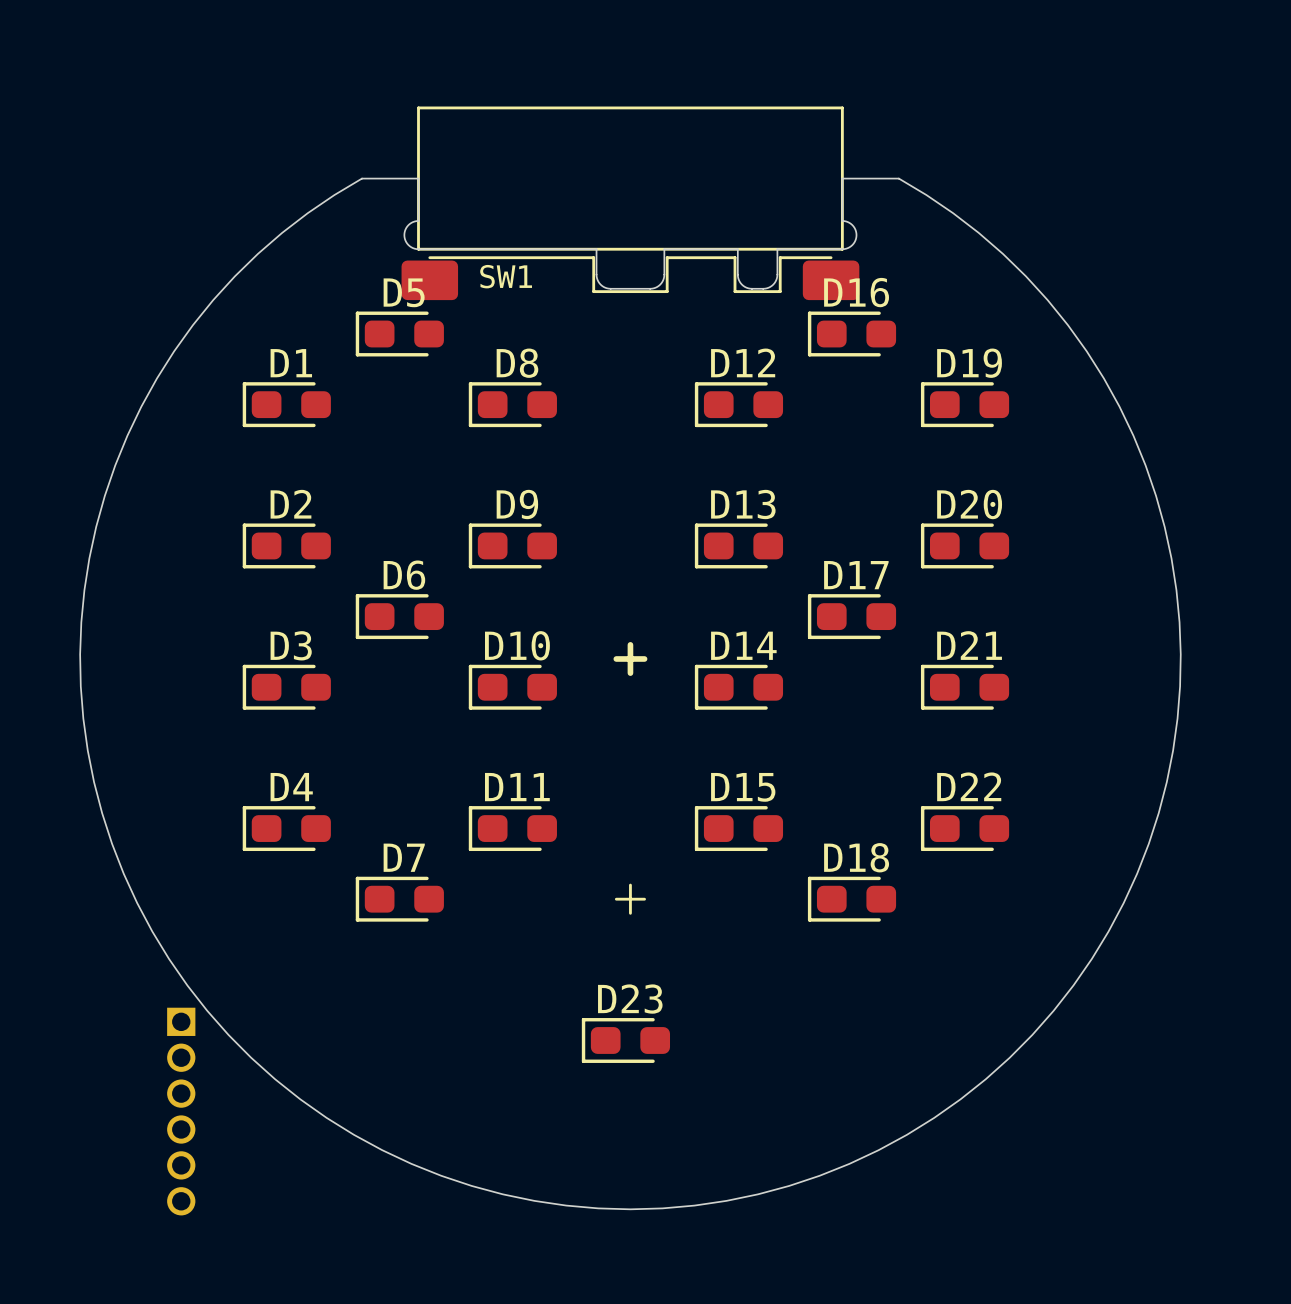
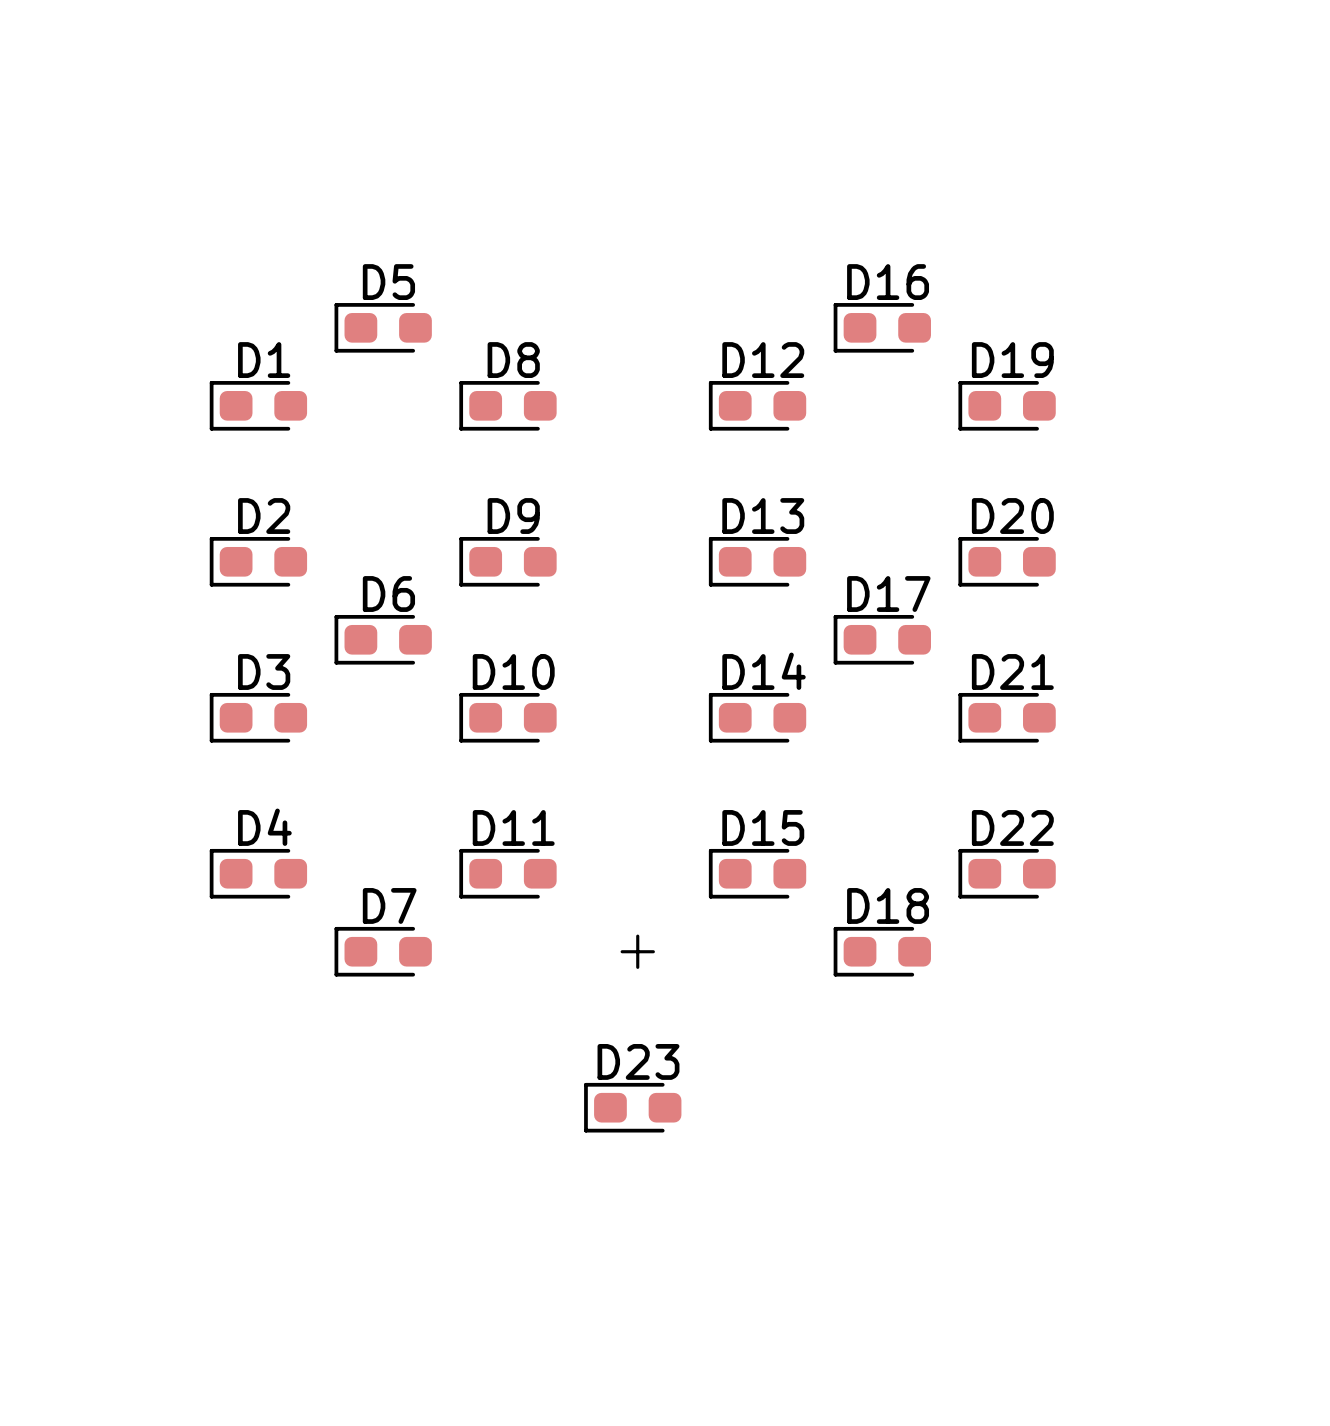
line: (418, 107) (842, 107) (842, 249) (418, 249) (418, 107) -> none
board edge: (361, 178) (418, 178) (418, 220) (409, 223) (404, 233) (406, 242) (413, 248) (596, 249) (597, 280) (603, 286) (610, 288) (650, 288) (658, 285) (664, 276) (664, 249) (737, 249) (737, 276) (740, 283) (750, 288) (768, 287) (776, 278) (777, 249) (844, 249) (853, 243) (856, 236) (855, 229) (850, 223) (842, 220) (842, 178) (898, 178) (953, 213) (1002, 253) (1047, 300) (1086, 351) (1103, 378) (1133, 435) (1145, 465) (1164, 526) (1176, 590) (1179, 622) (1180, 686) (1173, 750) (1166, 782) (1148, 843) (1137, 873) (1108, 931) (1073, 985) (1032, 1034) (985, 1079) (934, 1117) (906, 1134) (849, 1163) (789, 1185) (726, 1200) (694, 1205) (630, 1209) (566, 1205) (534, 1200) (471, 1185) (411, 1163) (382, 1150) (326, 1117) (300, 1099) (251, 1057) (228, 1034) (187, 985) (152, 931) (123, 873) (102, 813) (87, 750) (83, 718) (80, 686) (81, 622) (89, 558) (104, 495) (127, 435) (156, 378) (174, 351) (213, 300) (257, 253) (282, 232) (307, 213) (361, 178) -> none
SW1: (630, 278) -> none
line: (630, 644) (630, 673) -> none
line: (616, 658) (644, 658) -> none
part: (181, 1111) -> none

